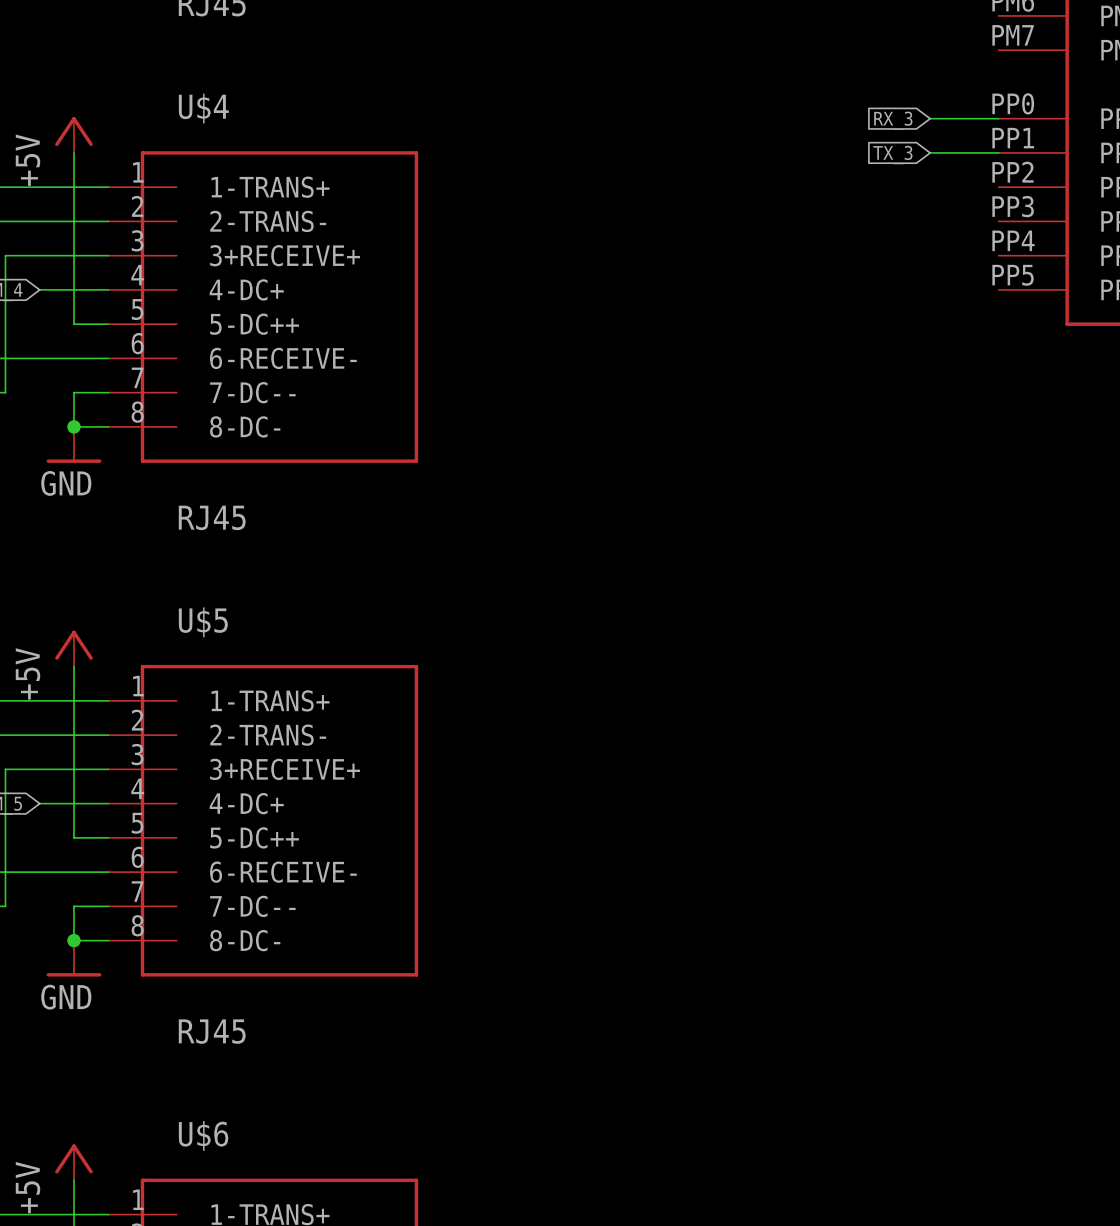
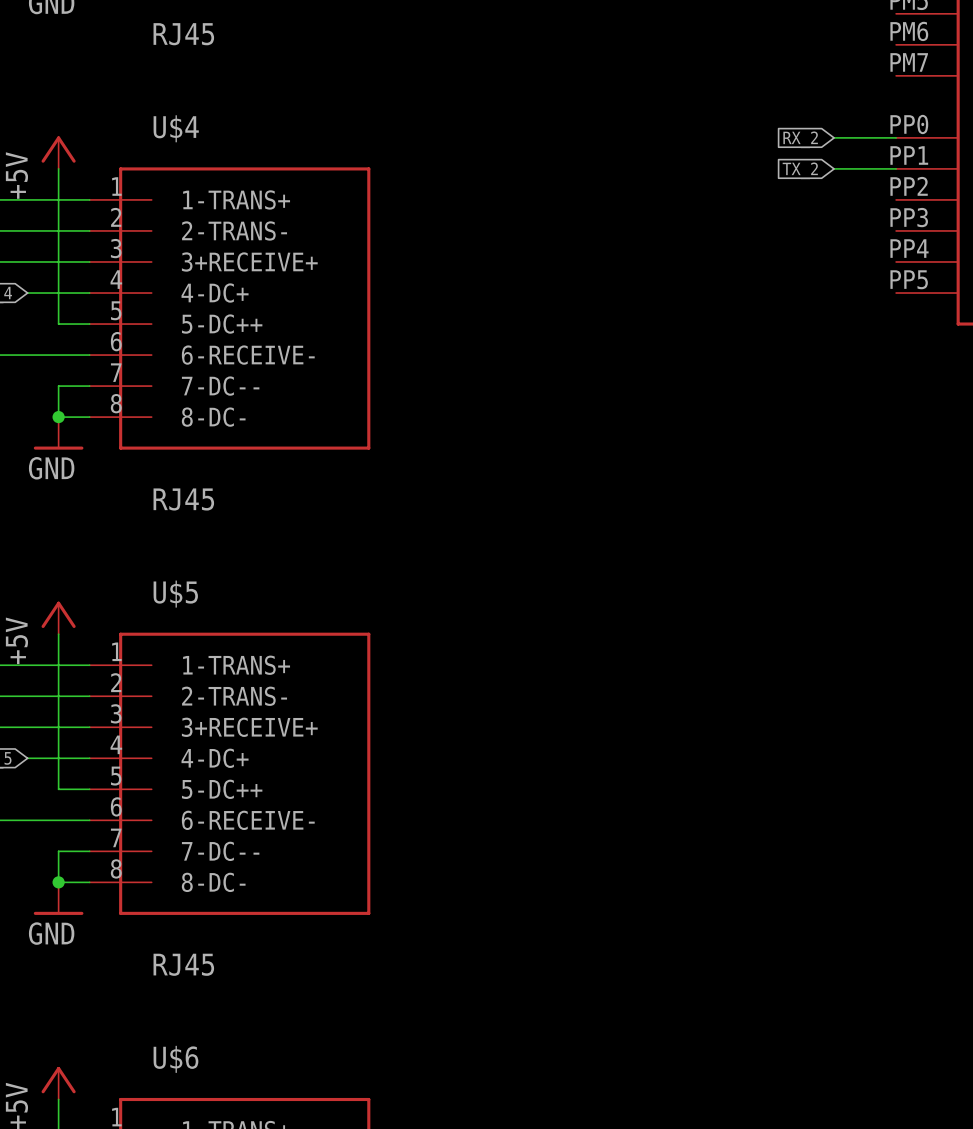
global label: RX_3 (893, 120) -> RX_2 (800, 139)
global label: TX_3 (892, 155) -> TX_2 (800, 170)

